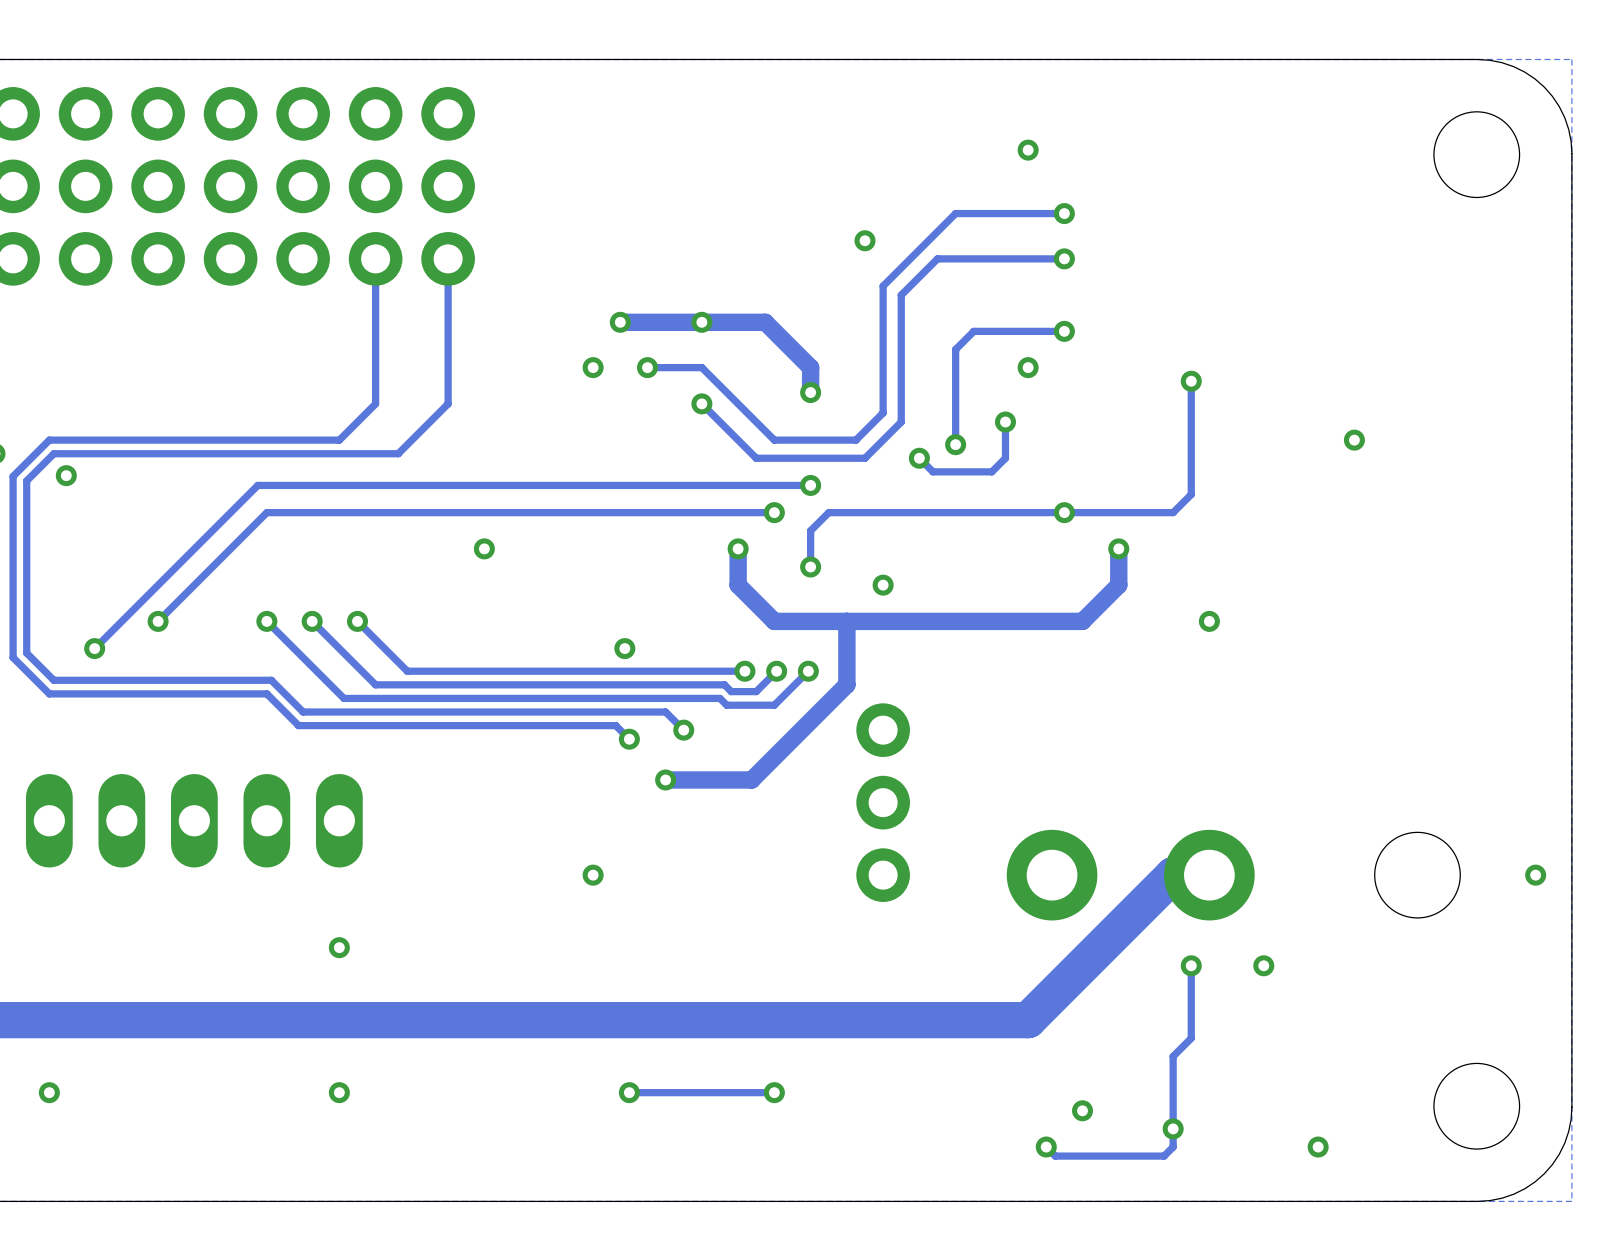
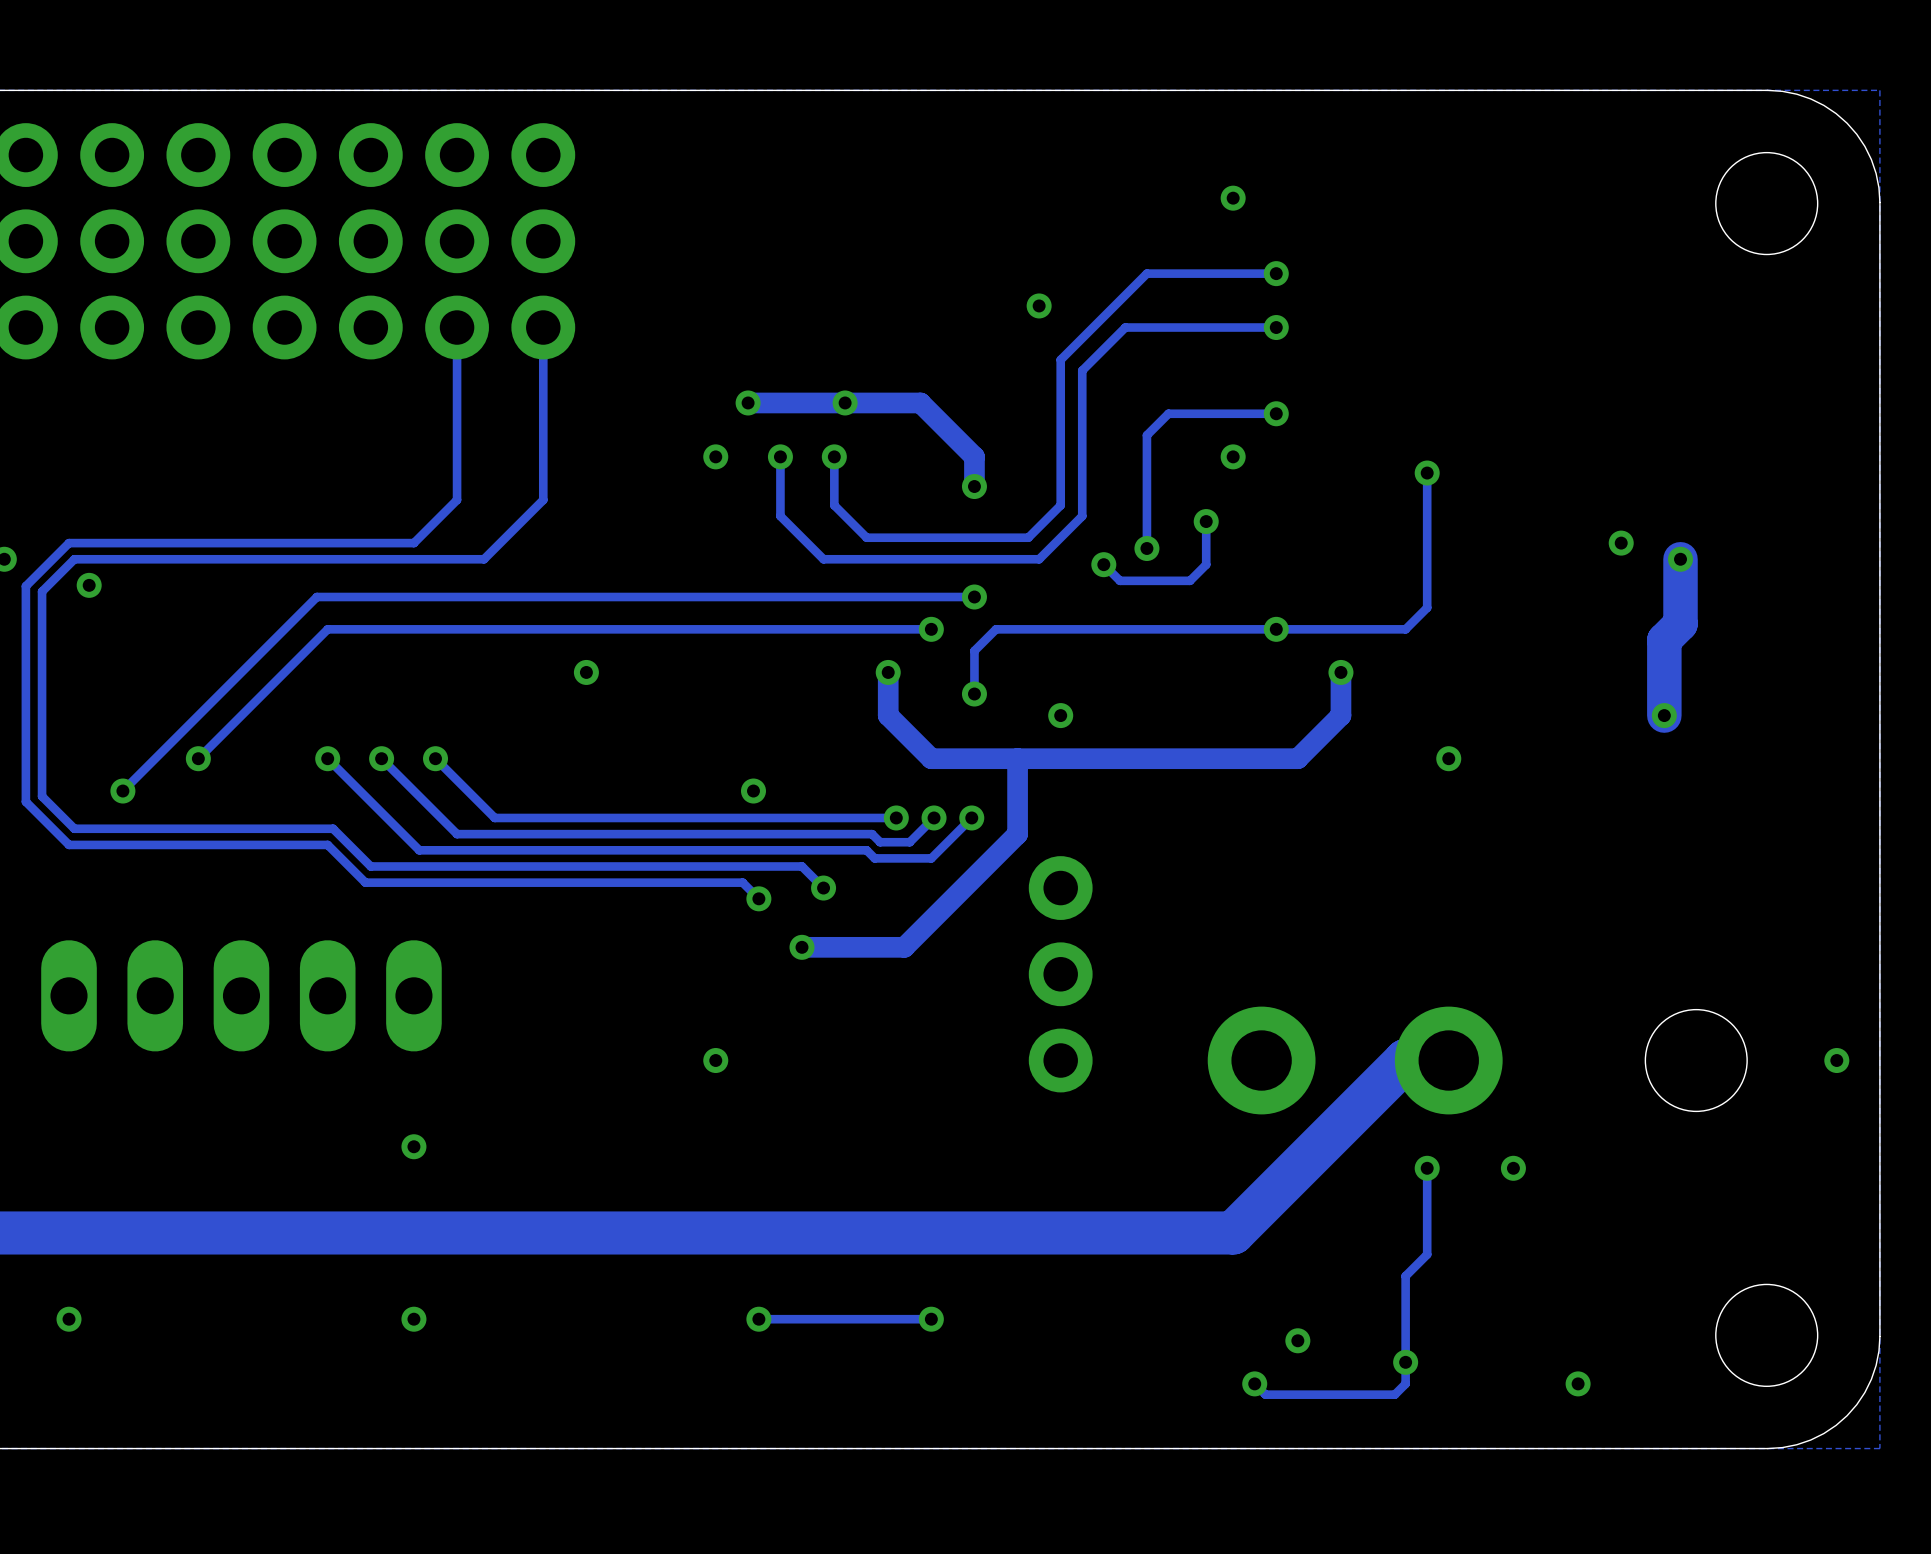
track: (647, 367) (701, 367) (774, 440) (855, 440) (883, 412) (883, 408) -> (780, 456) (780, 516) (823, 559) (1039, 559) (1082, 516)
track: none -> (834, 456) (834, 505) (866, 537) (1028, 537) (1060, 505)
track: (701, 403) (756, 458) (865, 458) (901, 422) (901, 417) -> none
via position: (701, 403) -> (834, 456)
track: none -> (1680, 559) (1680, 623) (1664, 640) (1664, 715)
via: none -> (1680, 559)
via: none -> (1664, 715)

